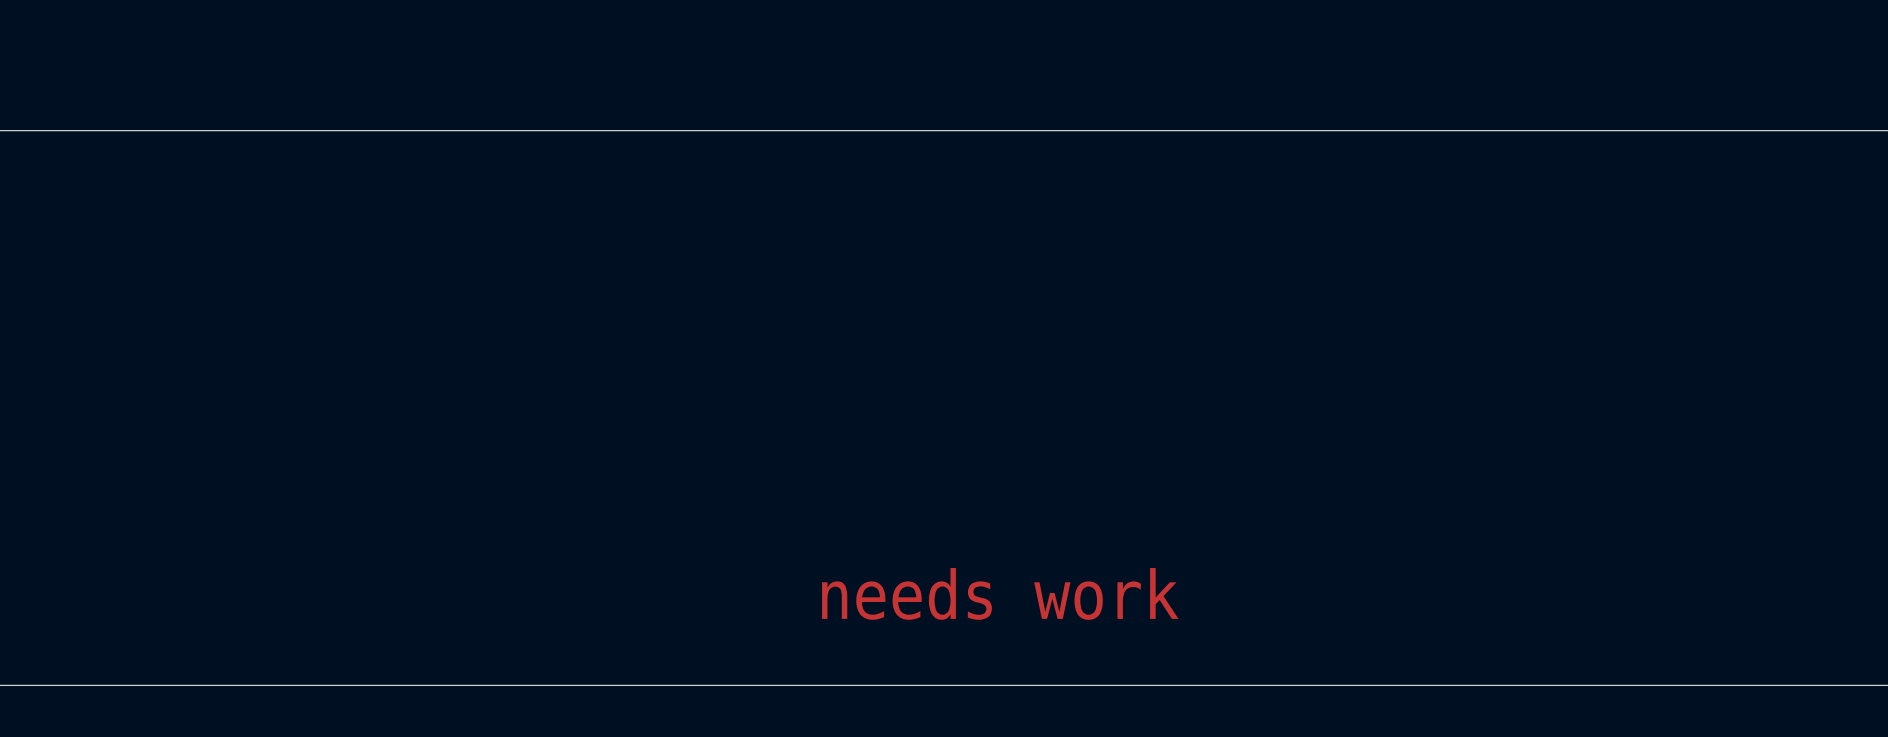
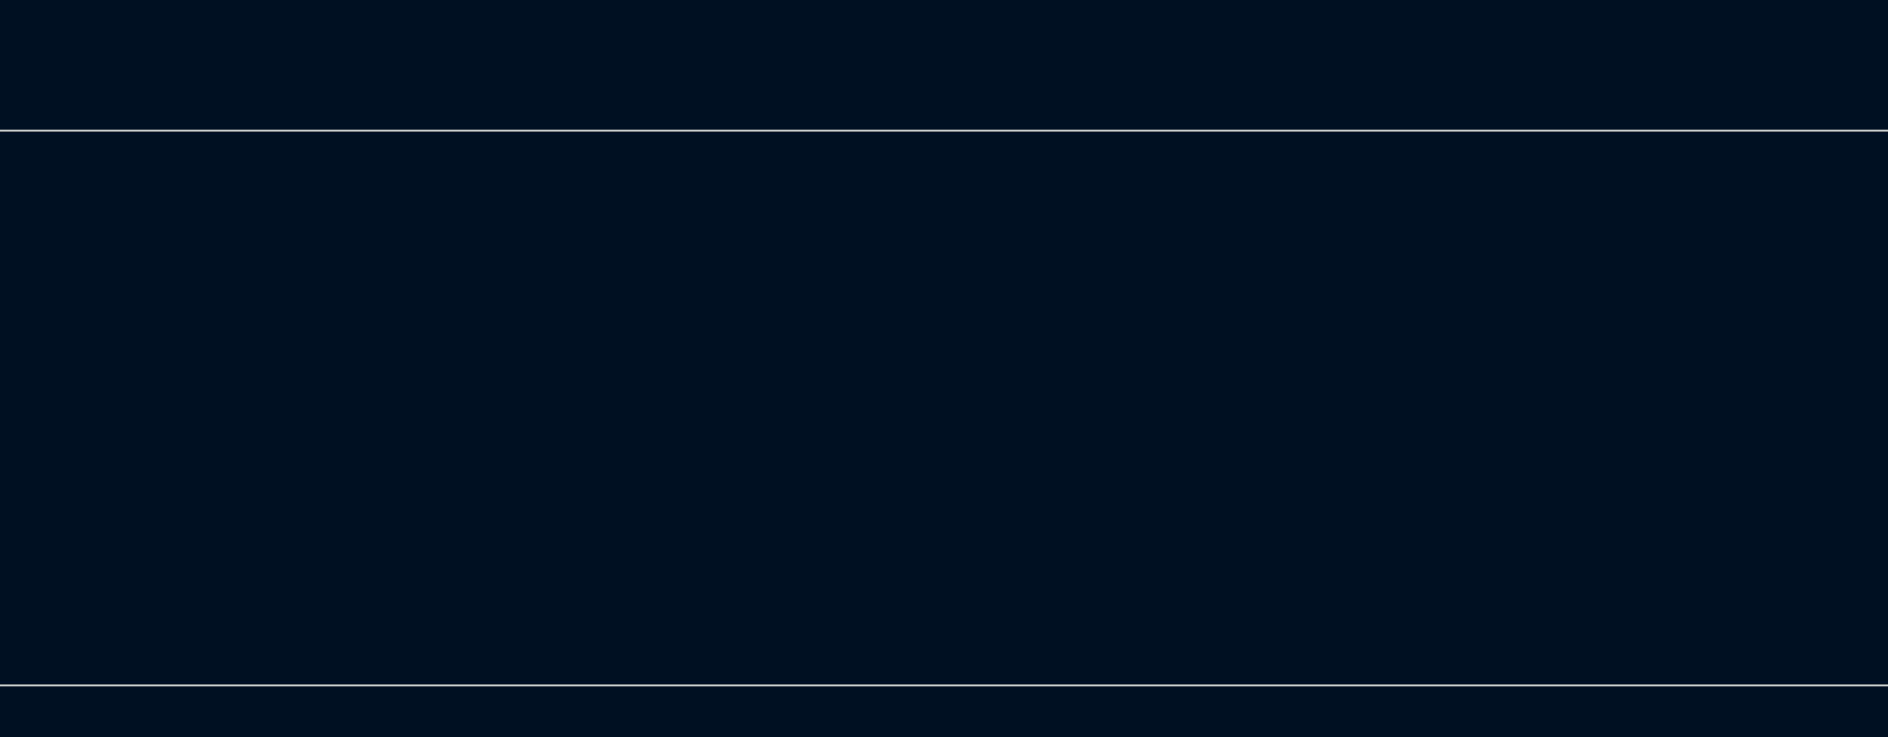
text: needs work (1000, 593) -> none

